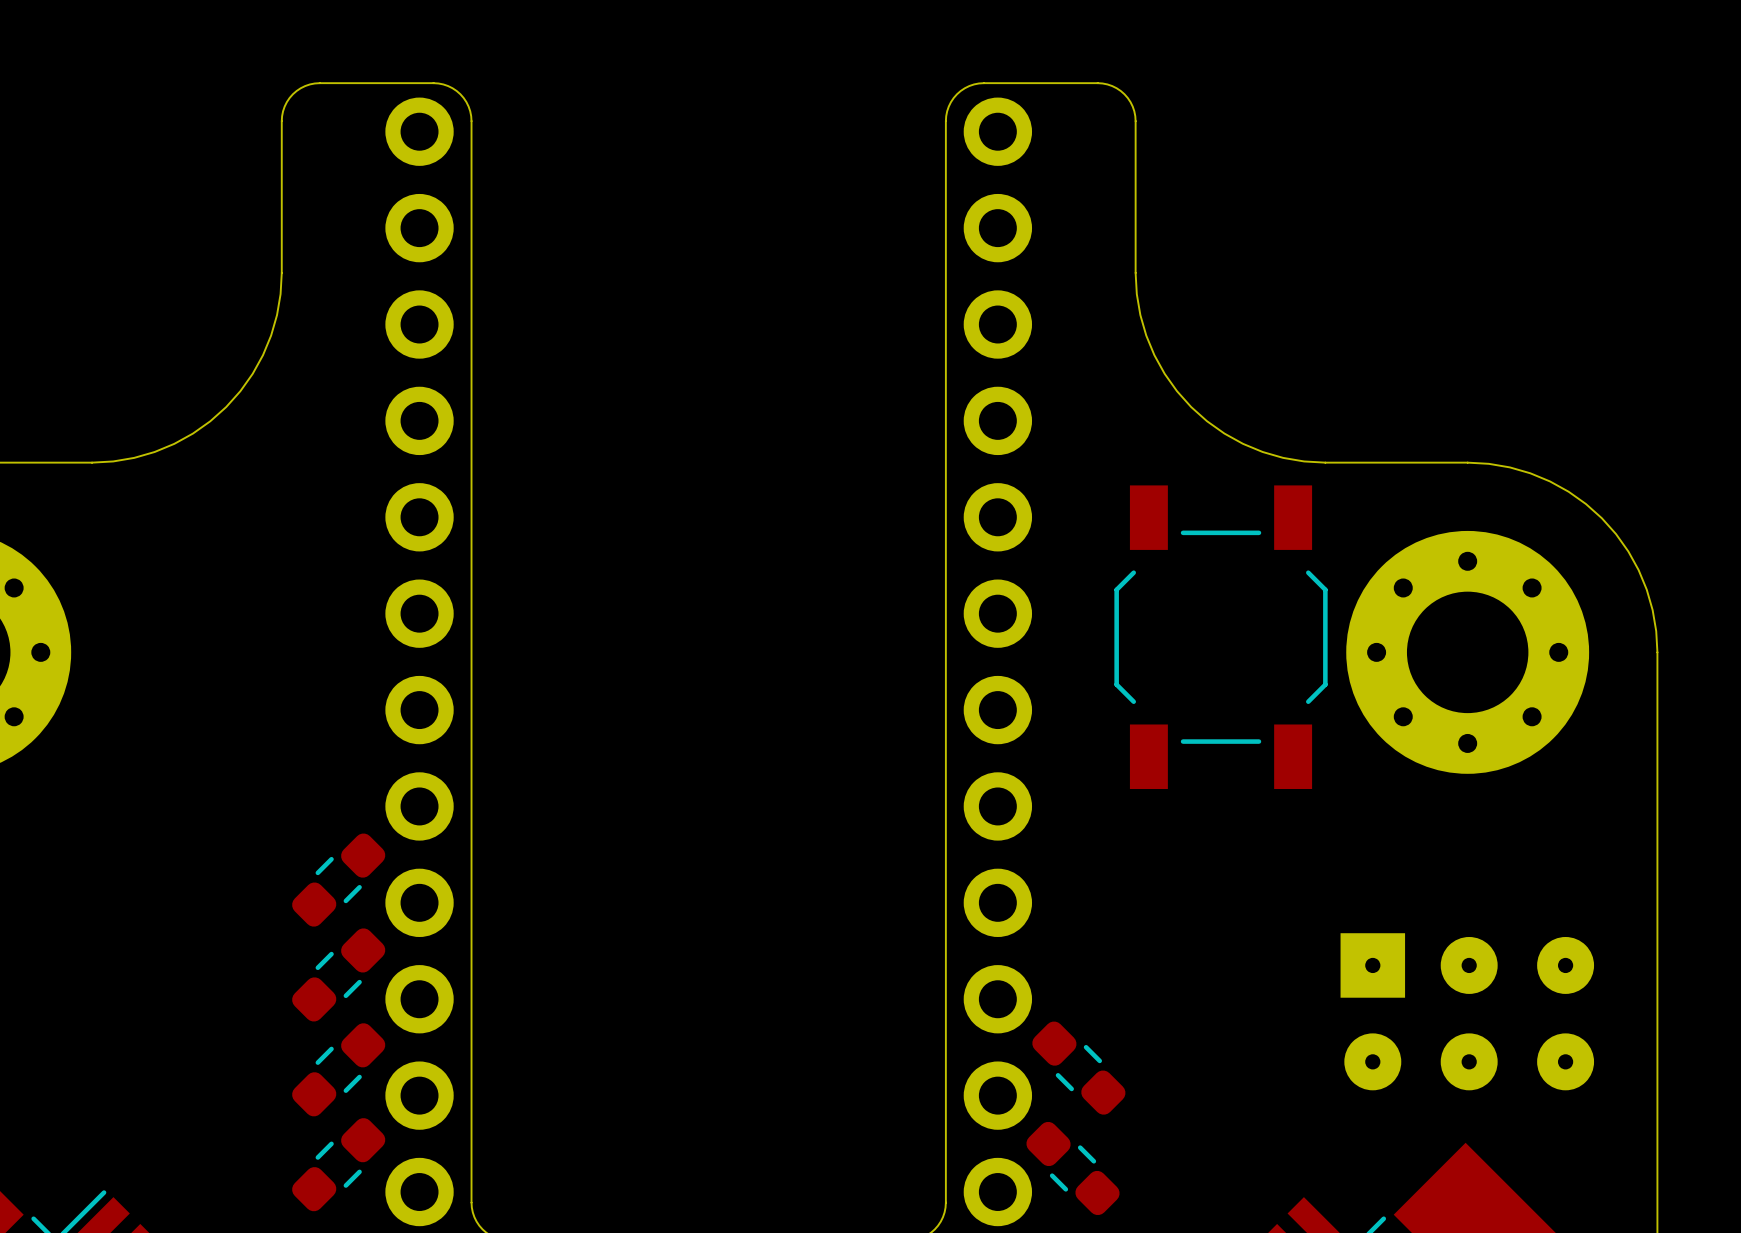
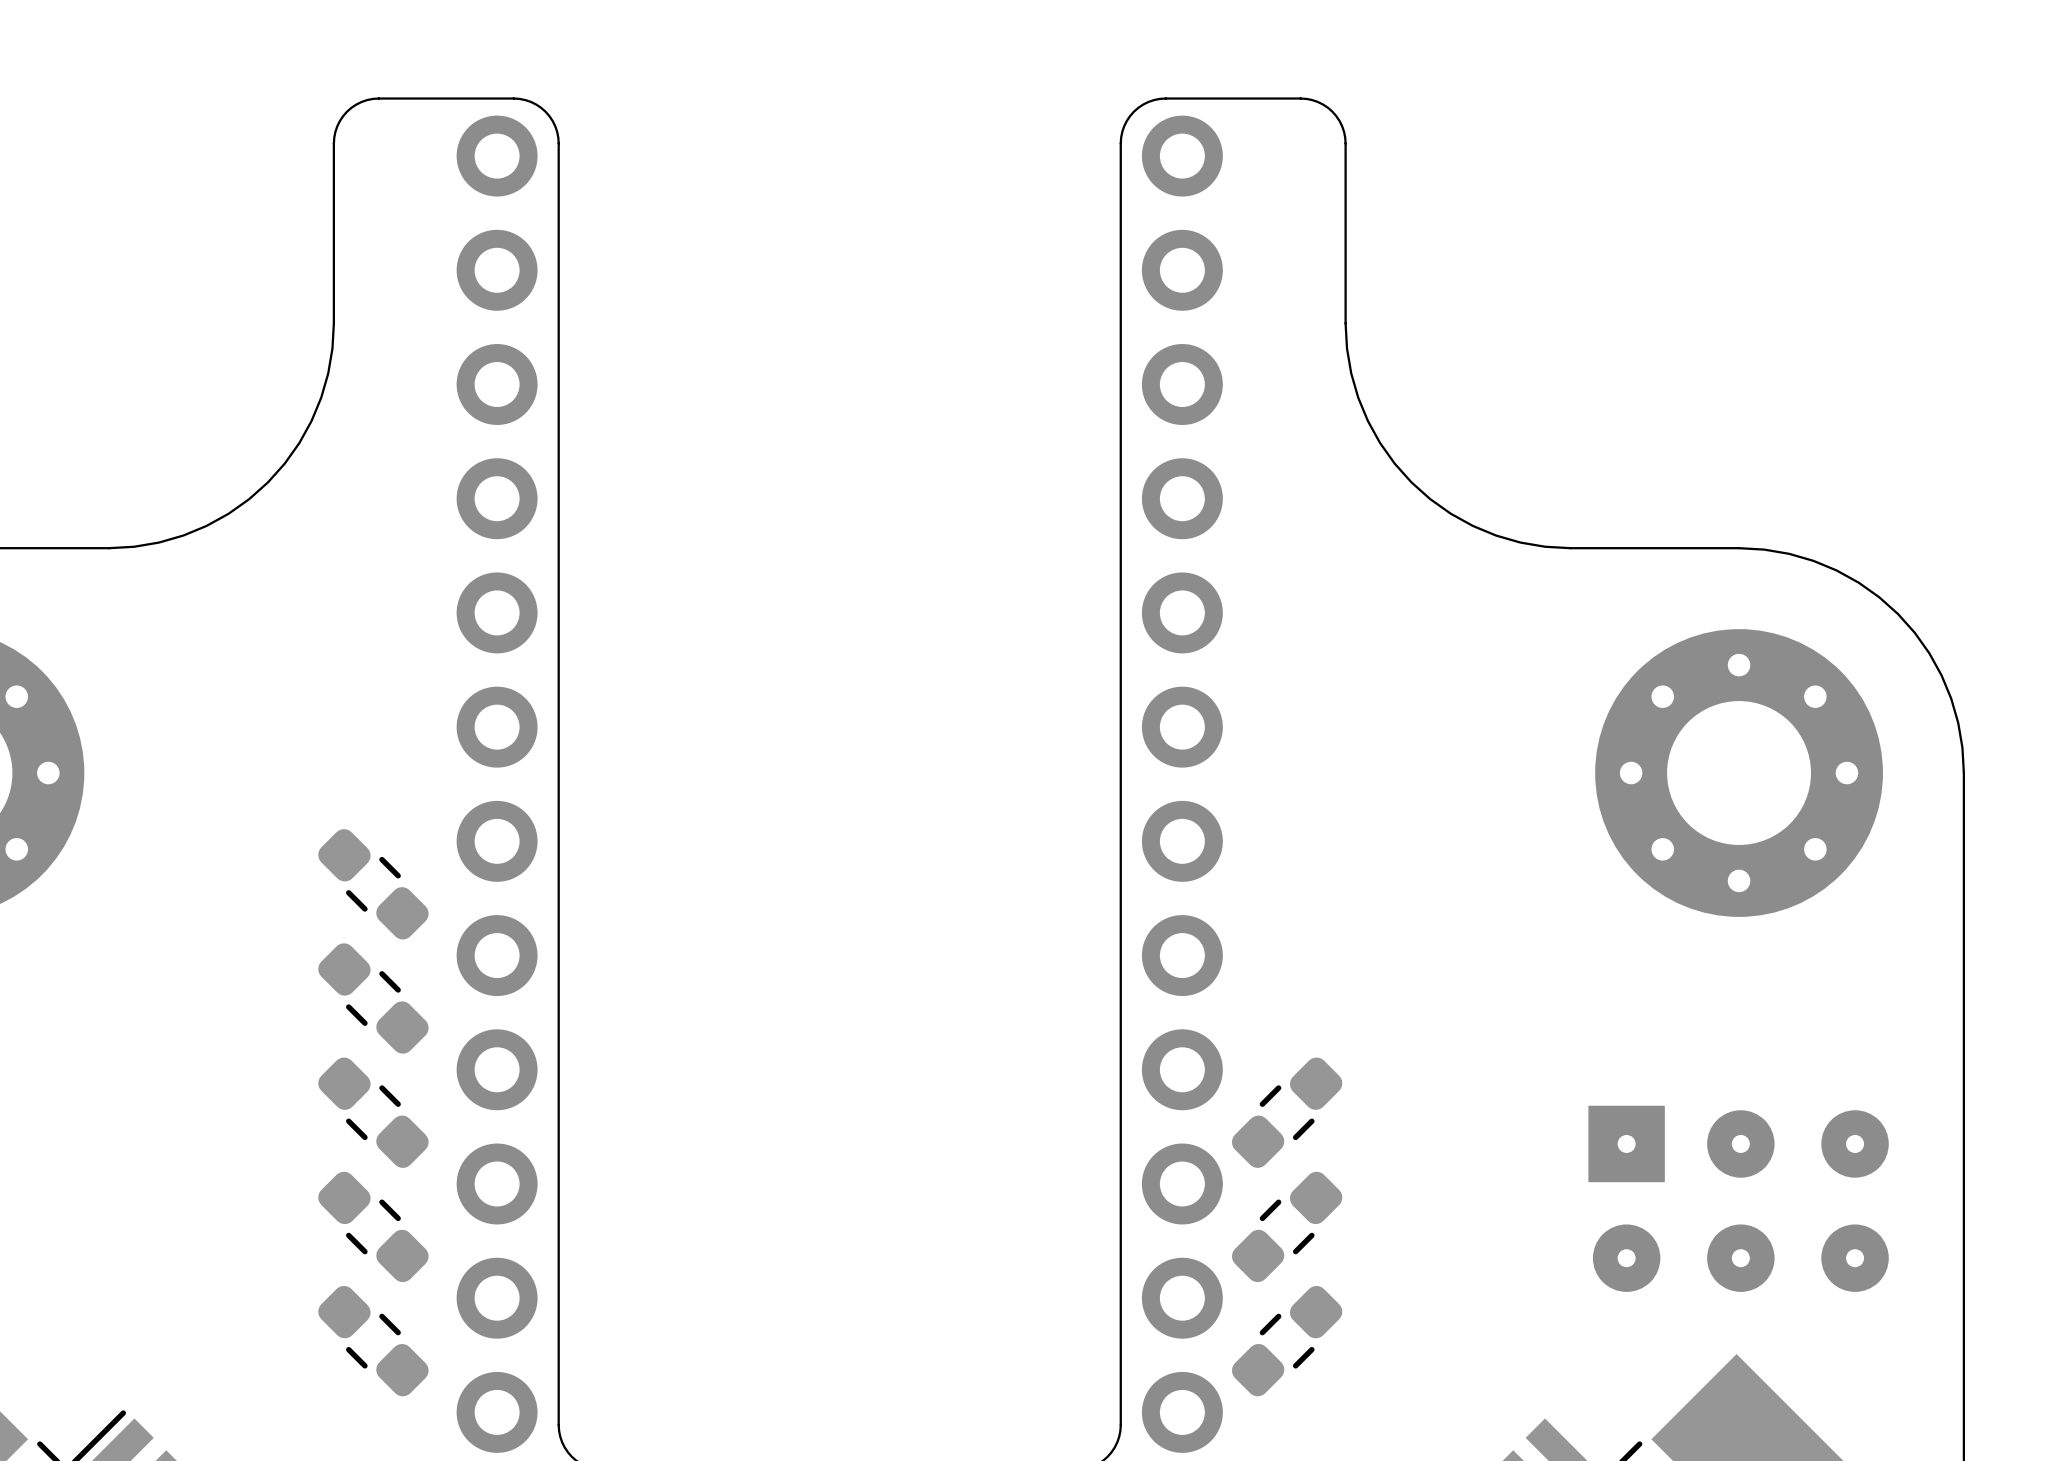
part: (1221, 637) -> none
part: none -> (373, 884)
part: none -> (373, 998)
part: (338, 880) -> none
part: none -> (373, 1112)
part: none -> (1287, 1112)
part: (338, 974) -> none
part: none -> (373, 1226)
part: none -> (1287, 1226)
part: (1078, 1068) -> none
part: (338, 1069) -> none
part: none -> (373, 1341)
part: none -> (1287, 1341)
part: (338, 1164) -> none
part: (1073, 1168) -> none

